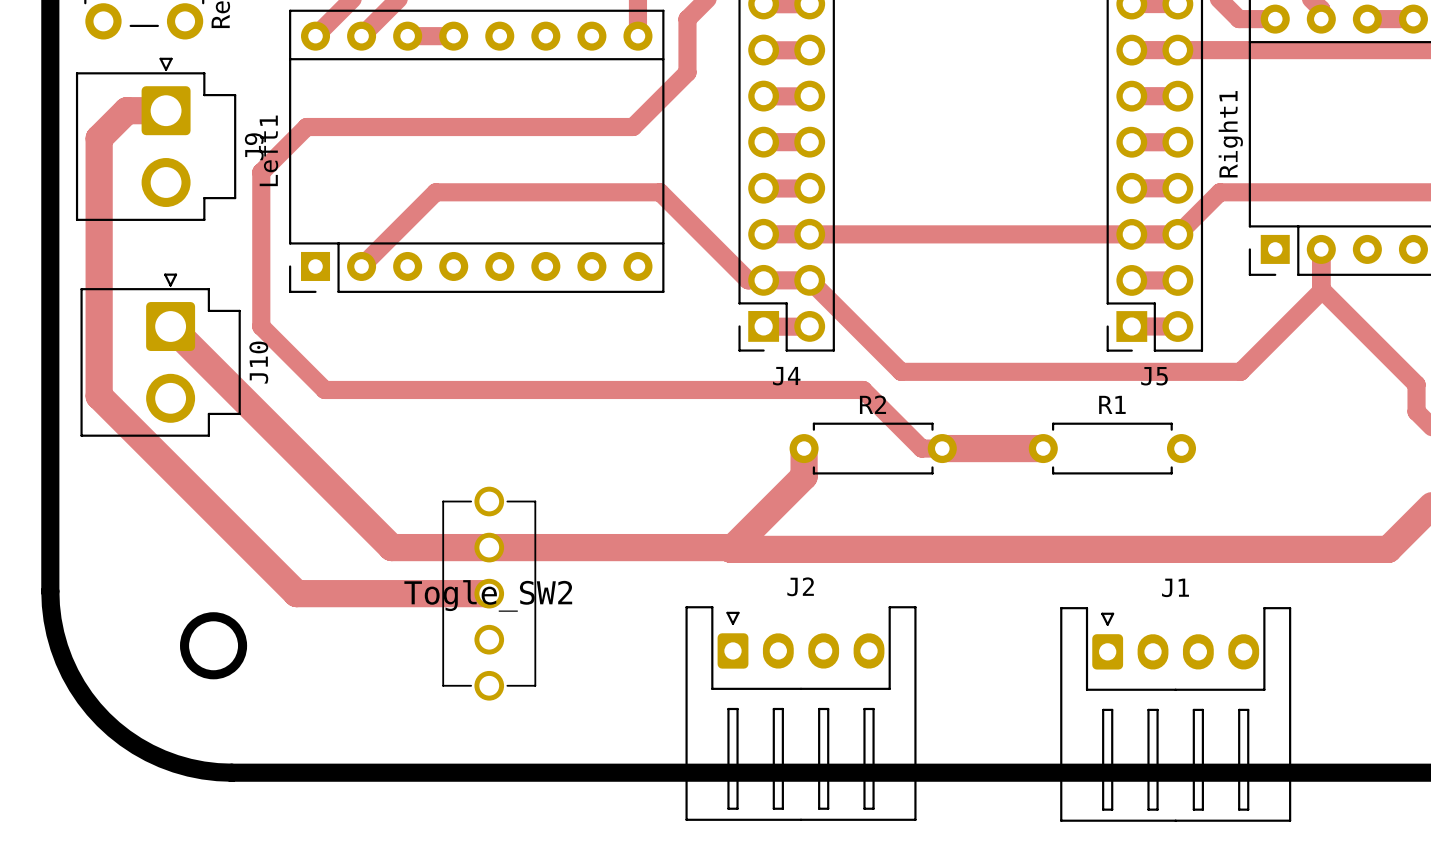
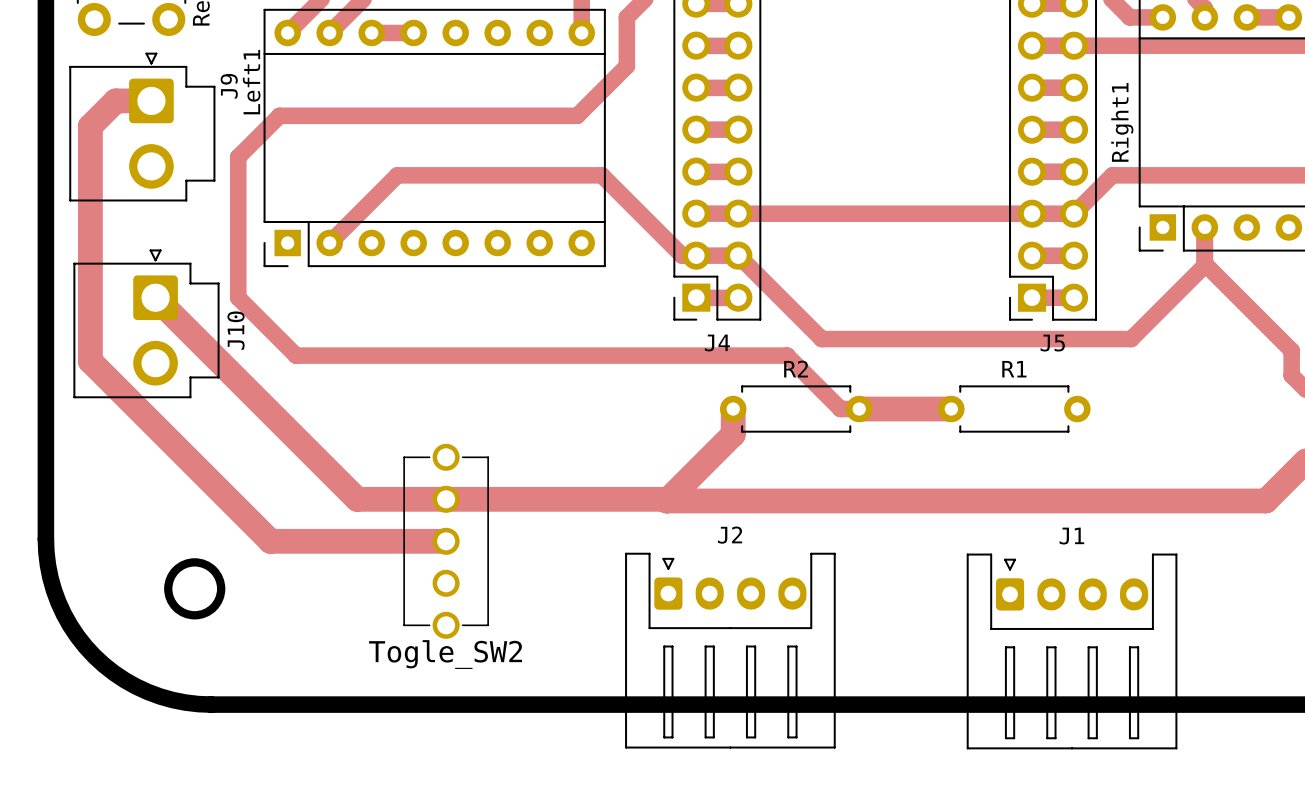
J9 name position: J9 (254, 146) -> J9 (229, 86)
Left1 name position: Left1 (268, 150) -> Left1 (251, 82)
Togle_SW2 name position: Togle_SW2 (488, 595) -> Togle_SW2 (445, 654)

